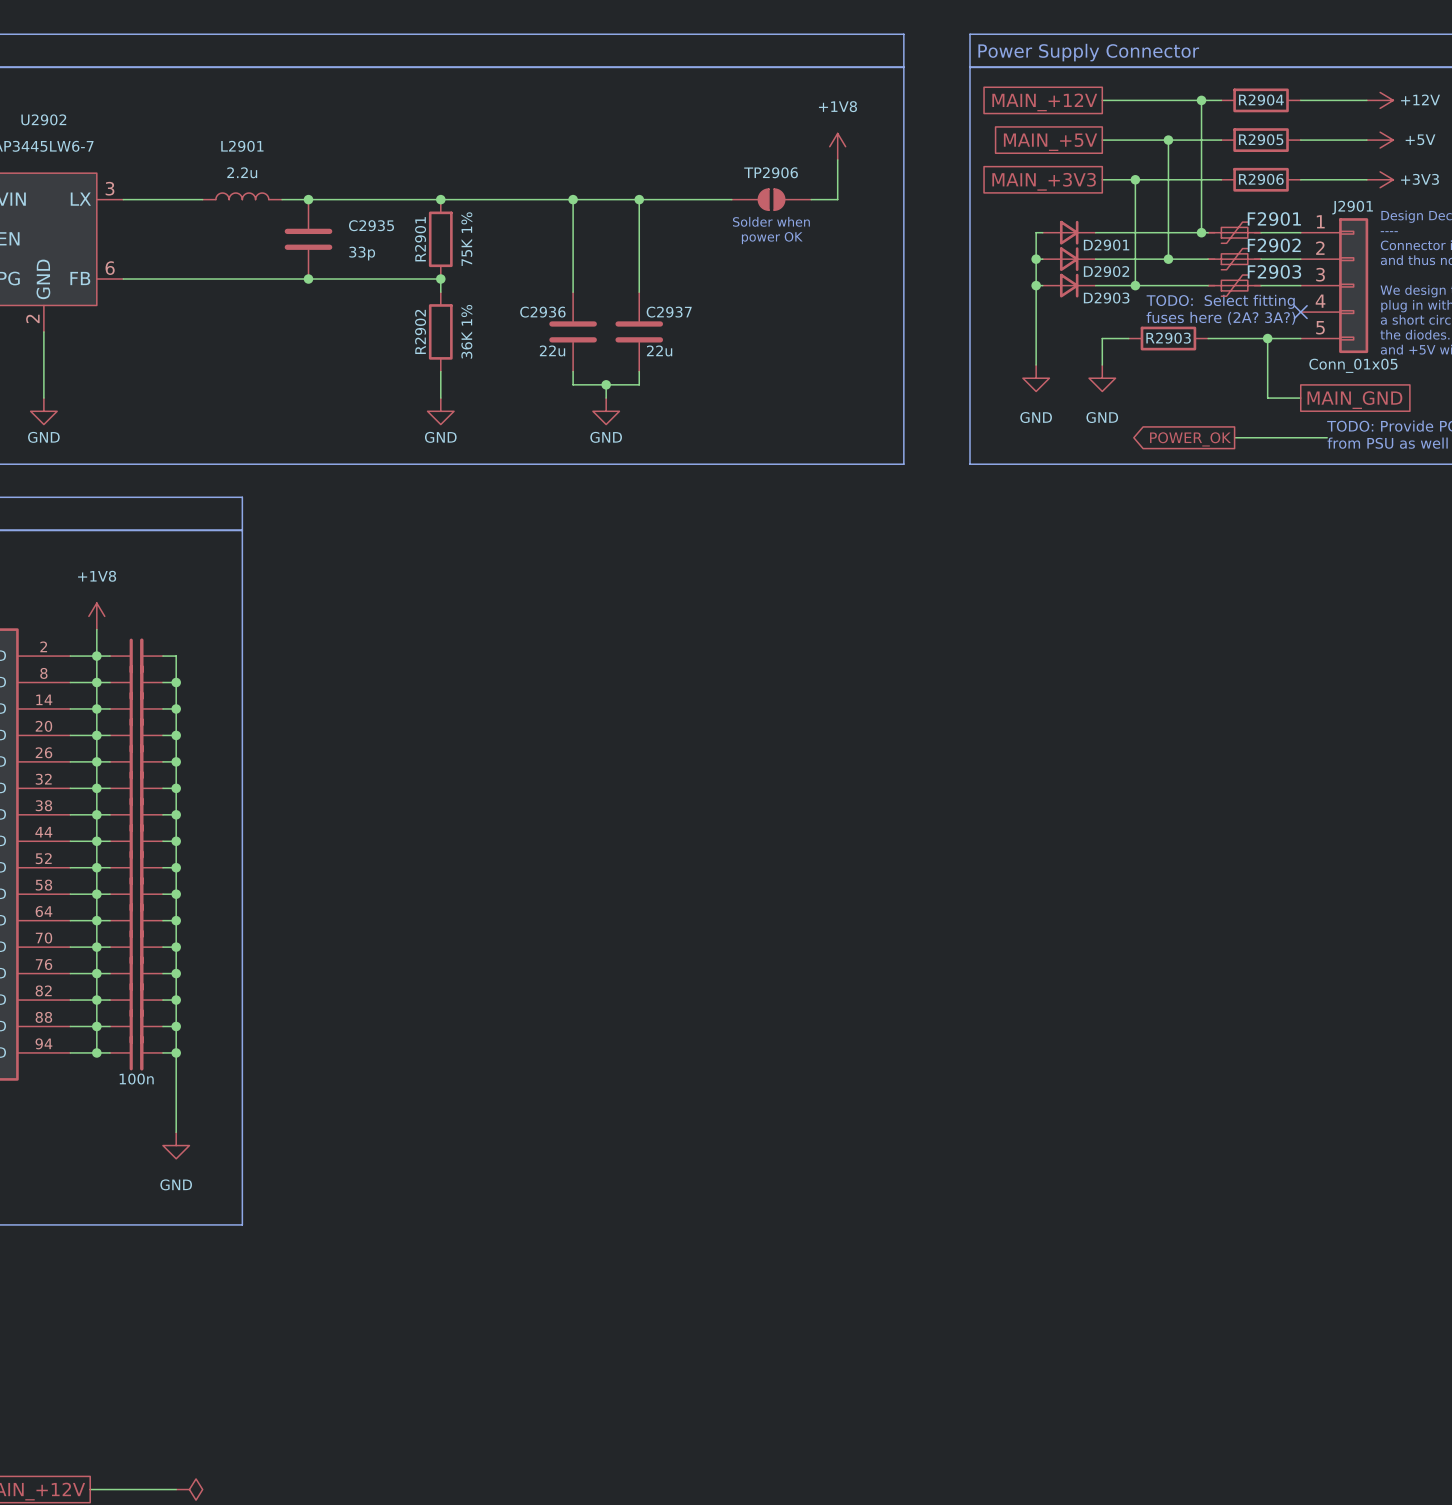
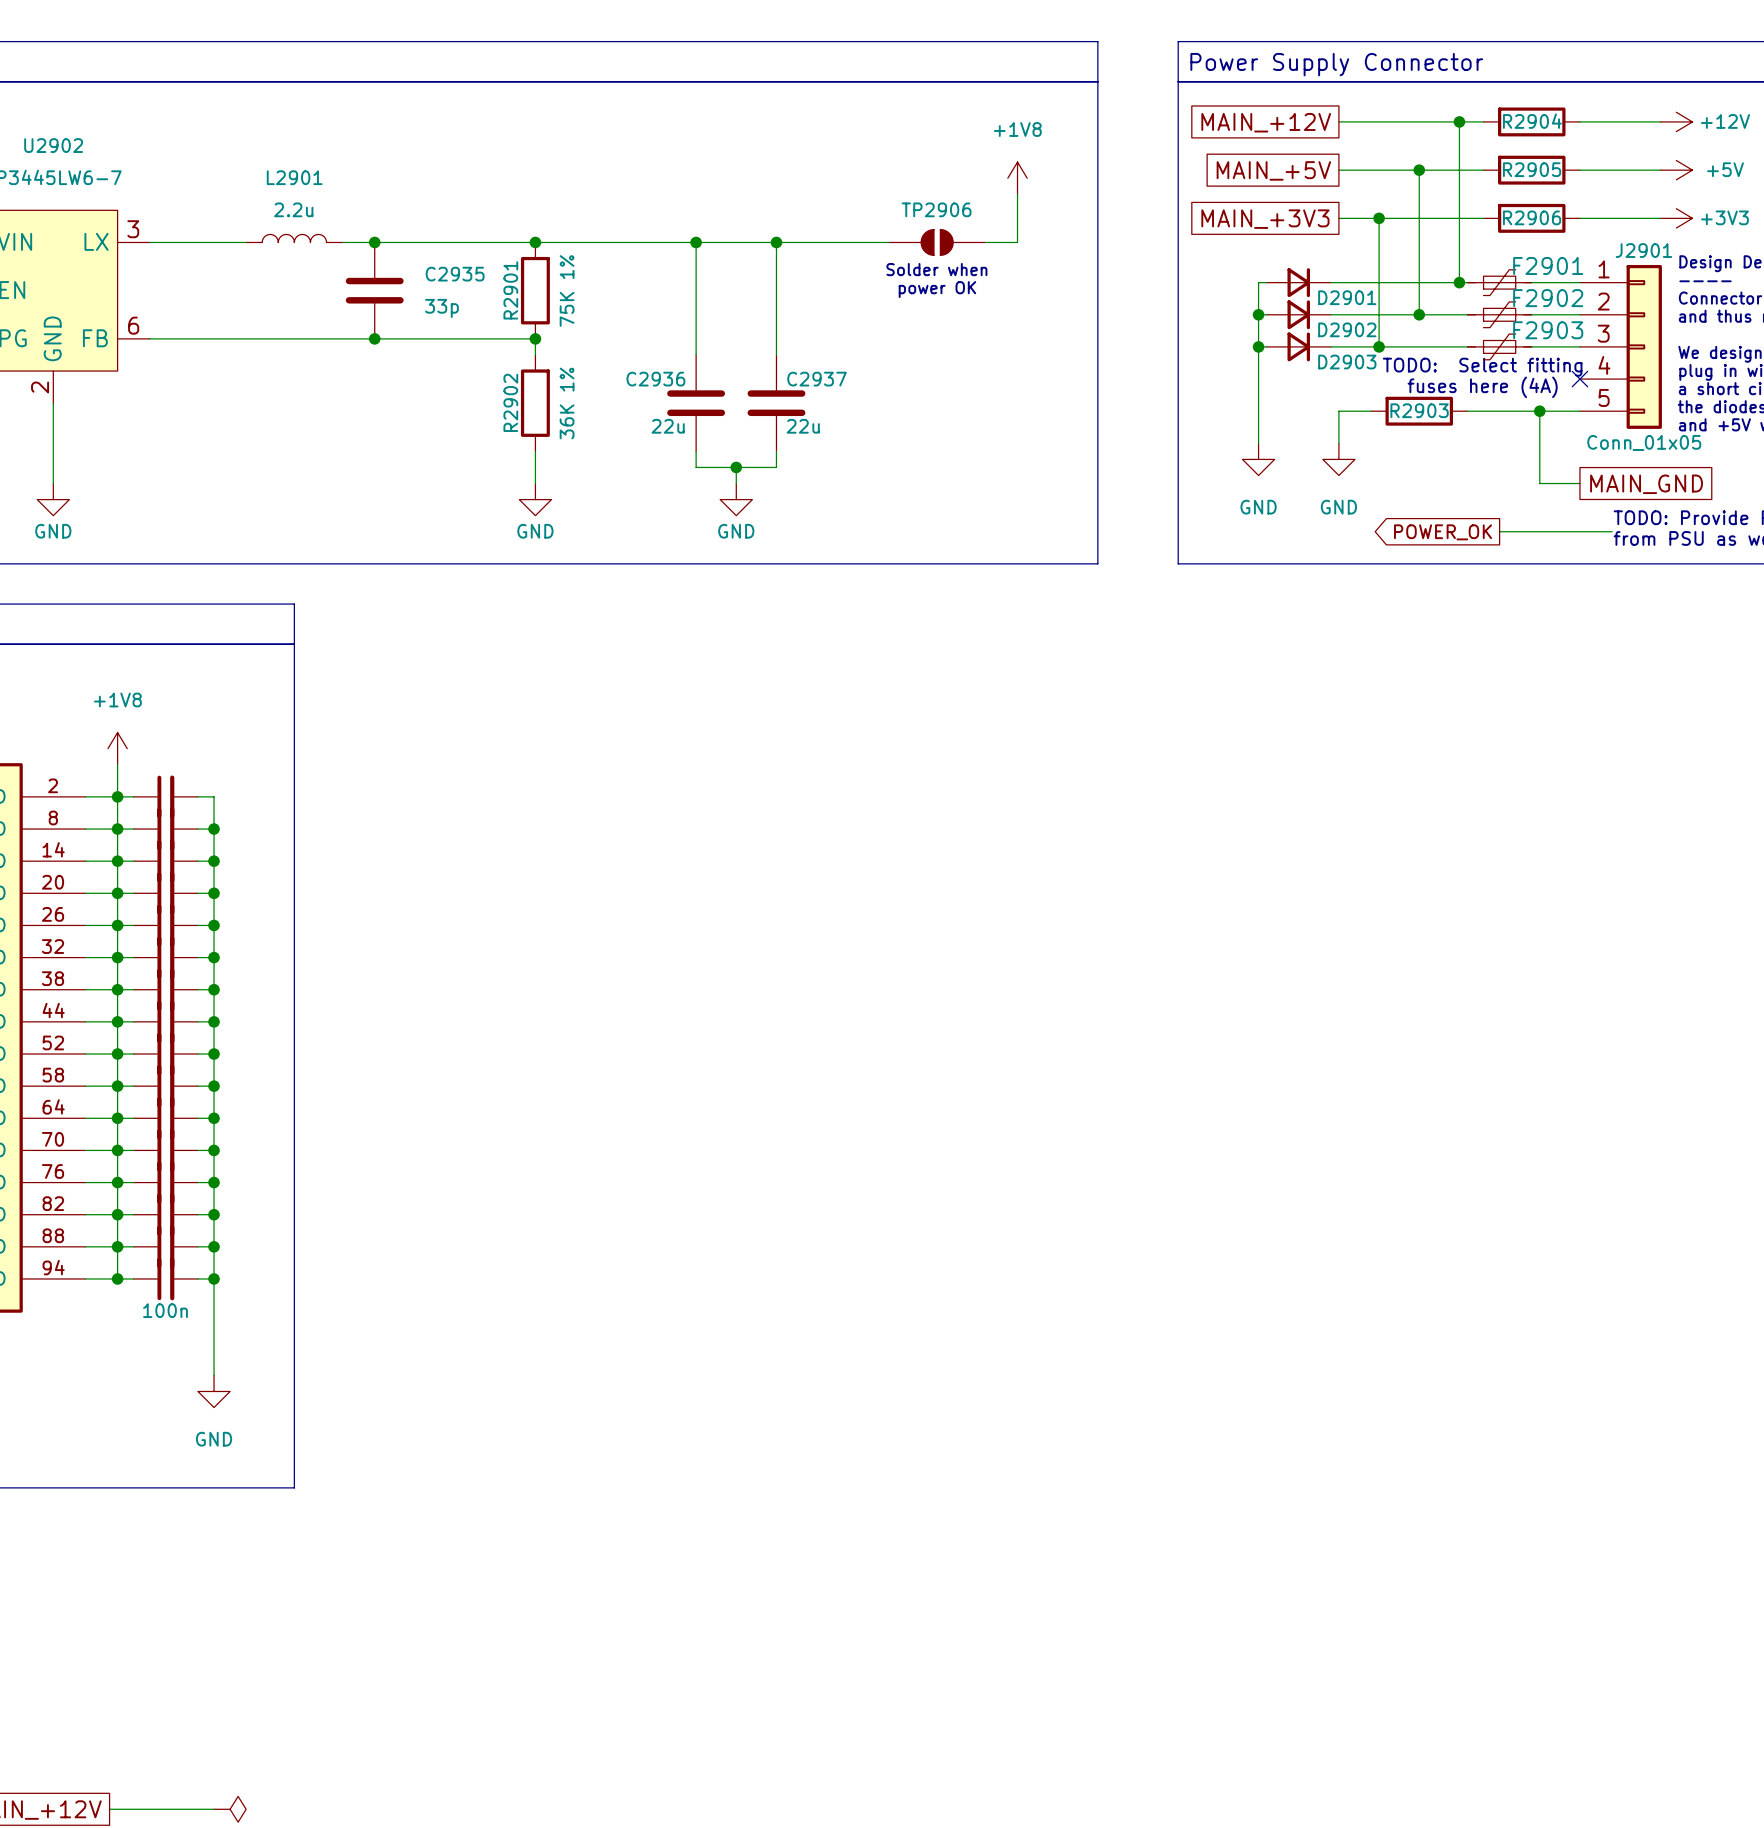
text: fuses here (2A? 3A?) (1220, 318) -> fuses here (4A) (1482, 387)

